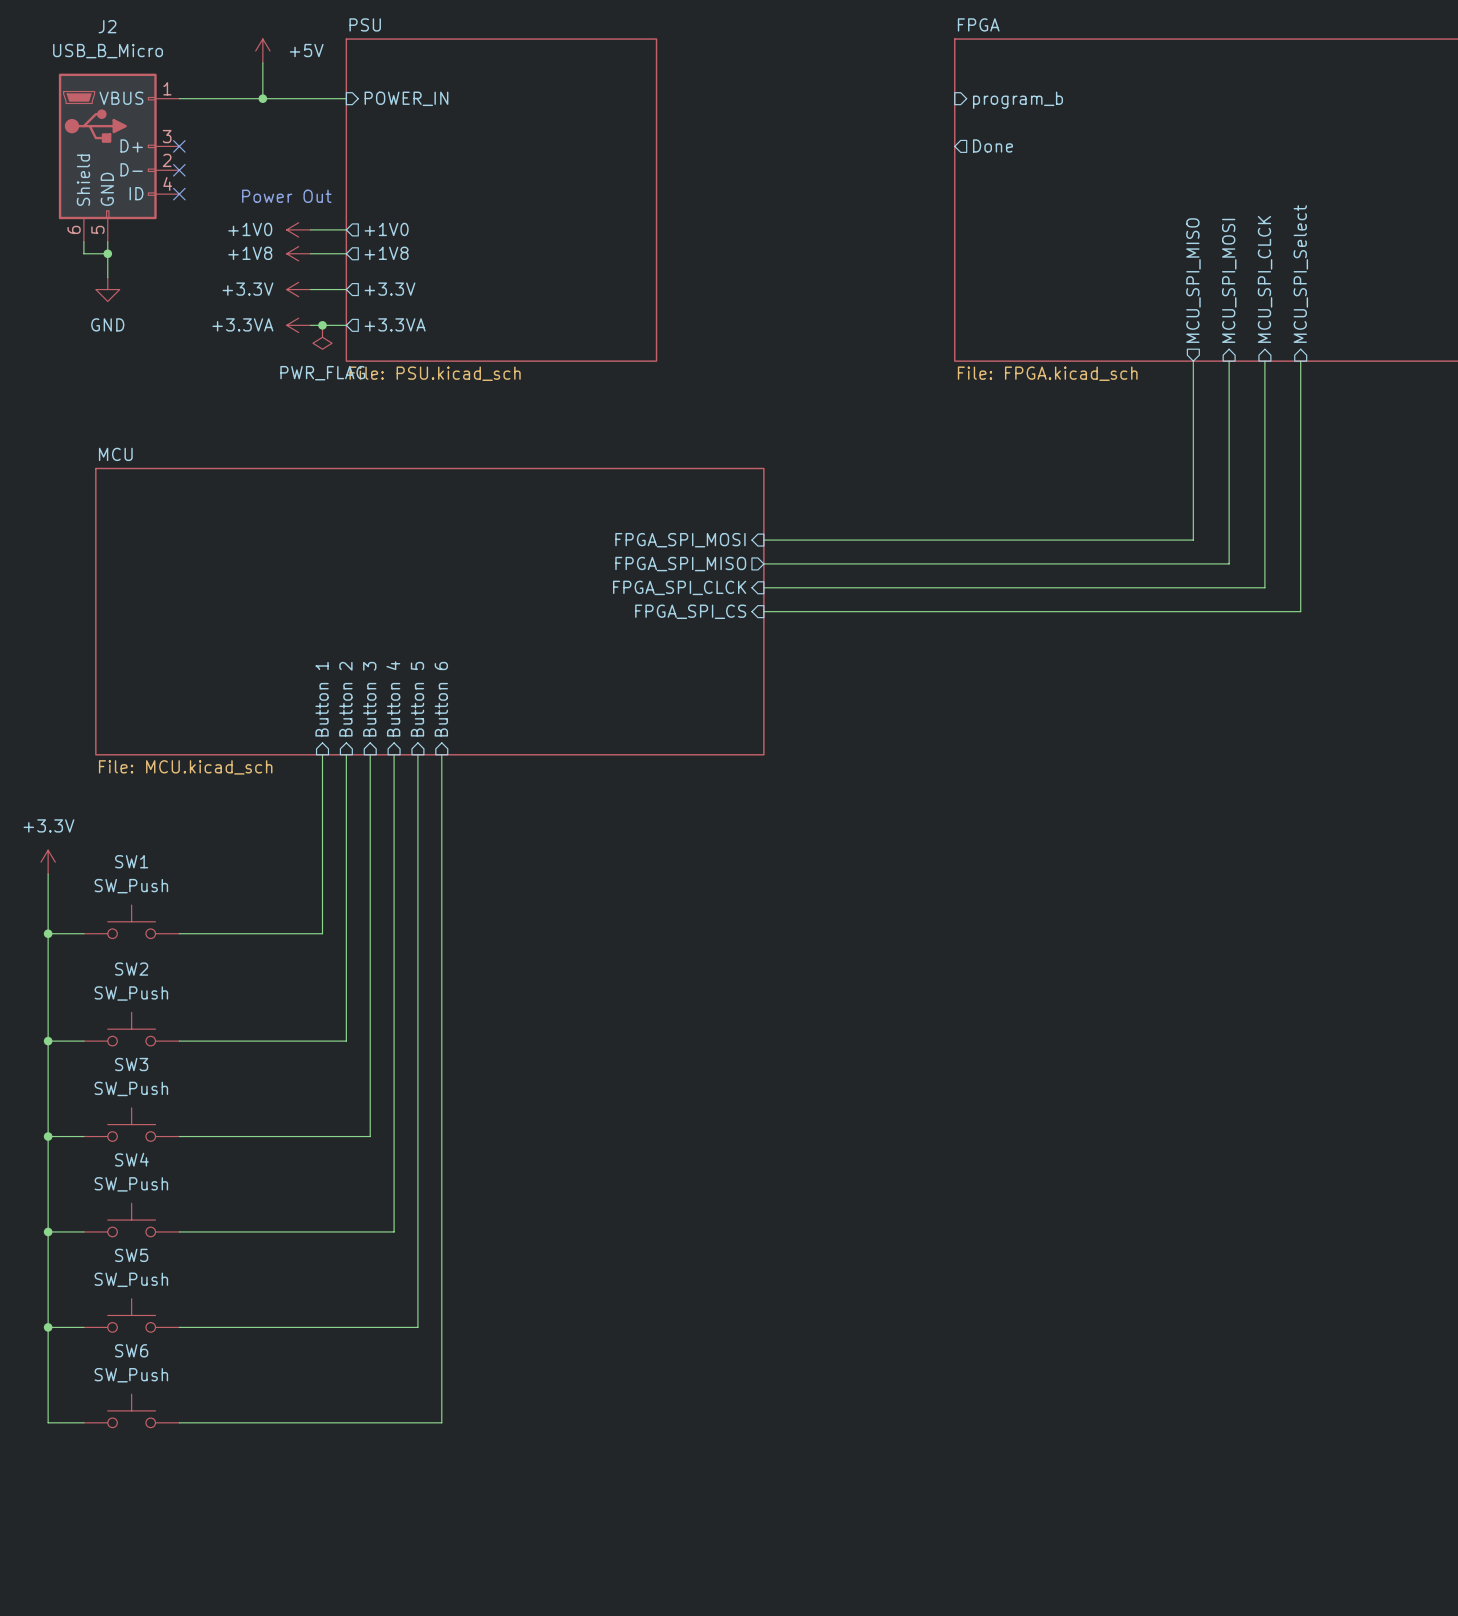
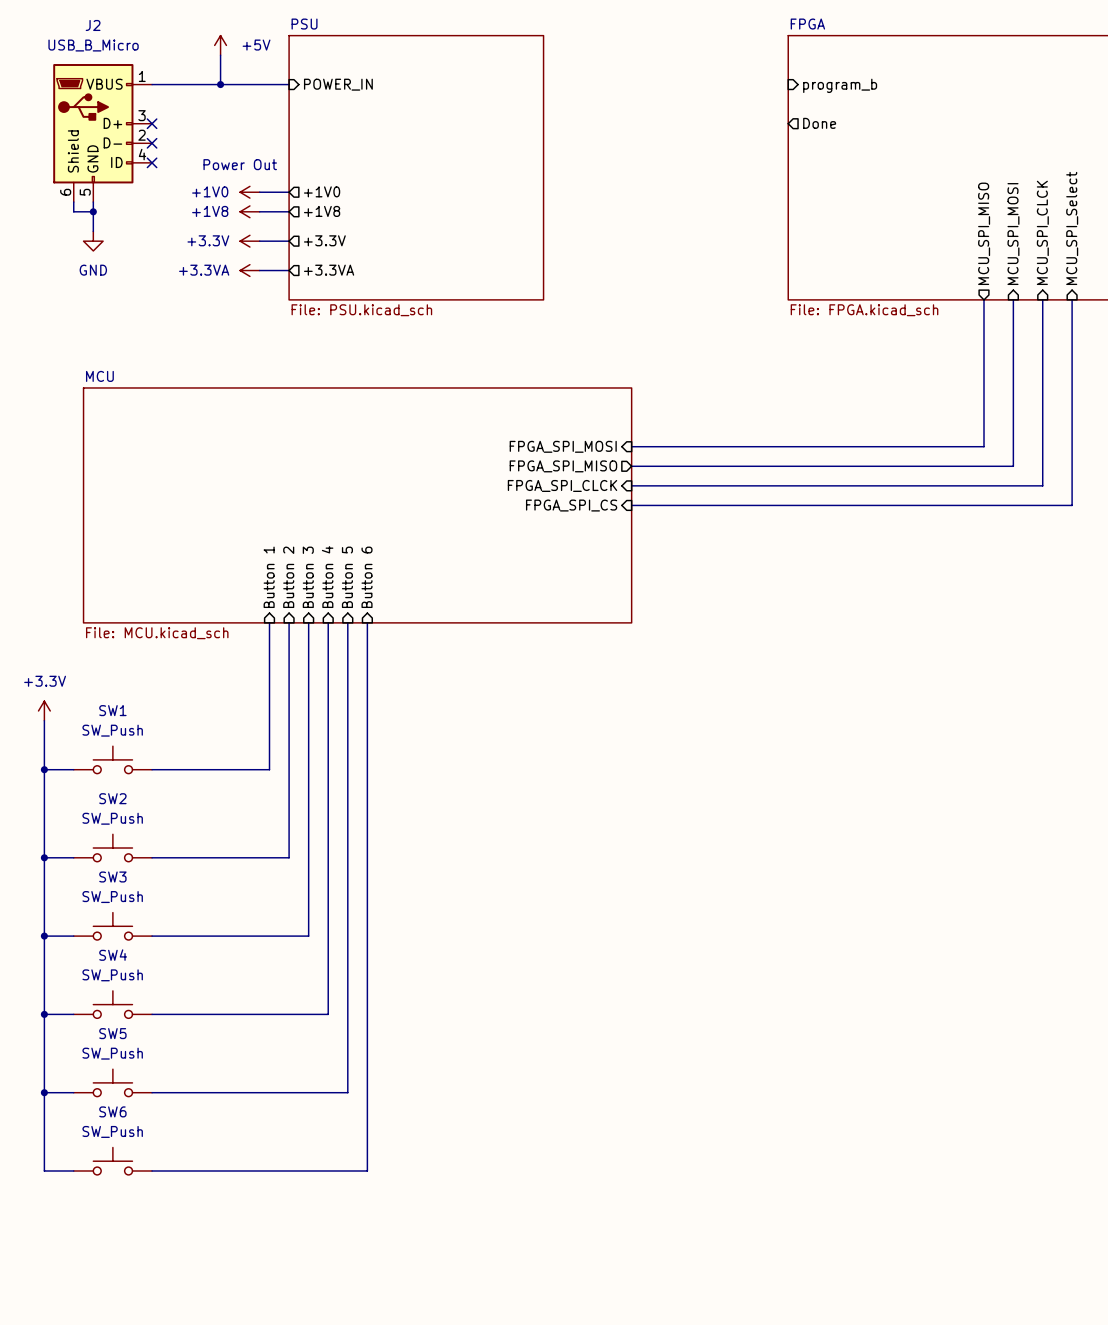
junction: (322, 325) -> none
power symbol: PWR_FLAG (322, 337) -> none

